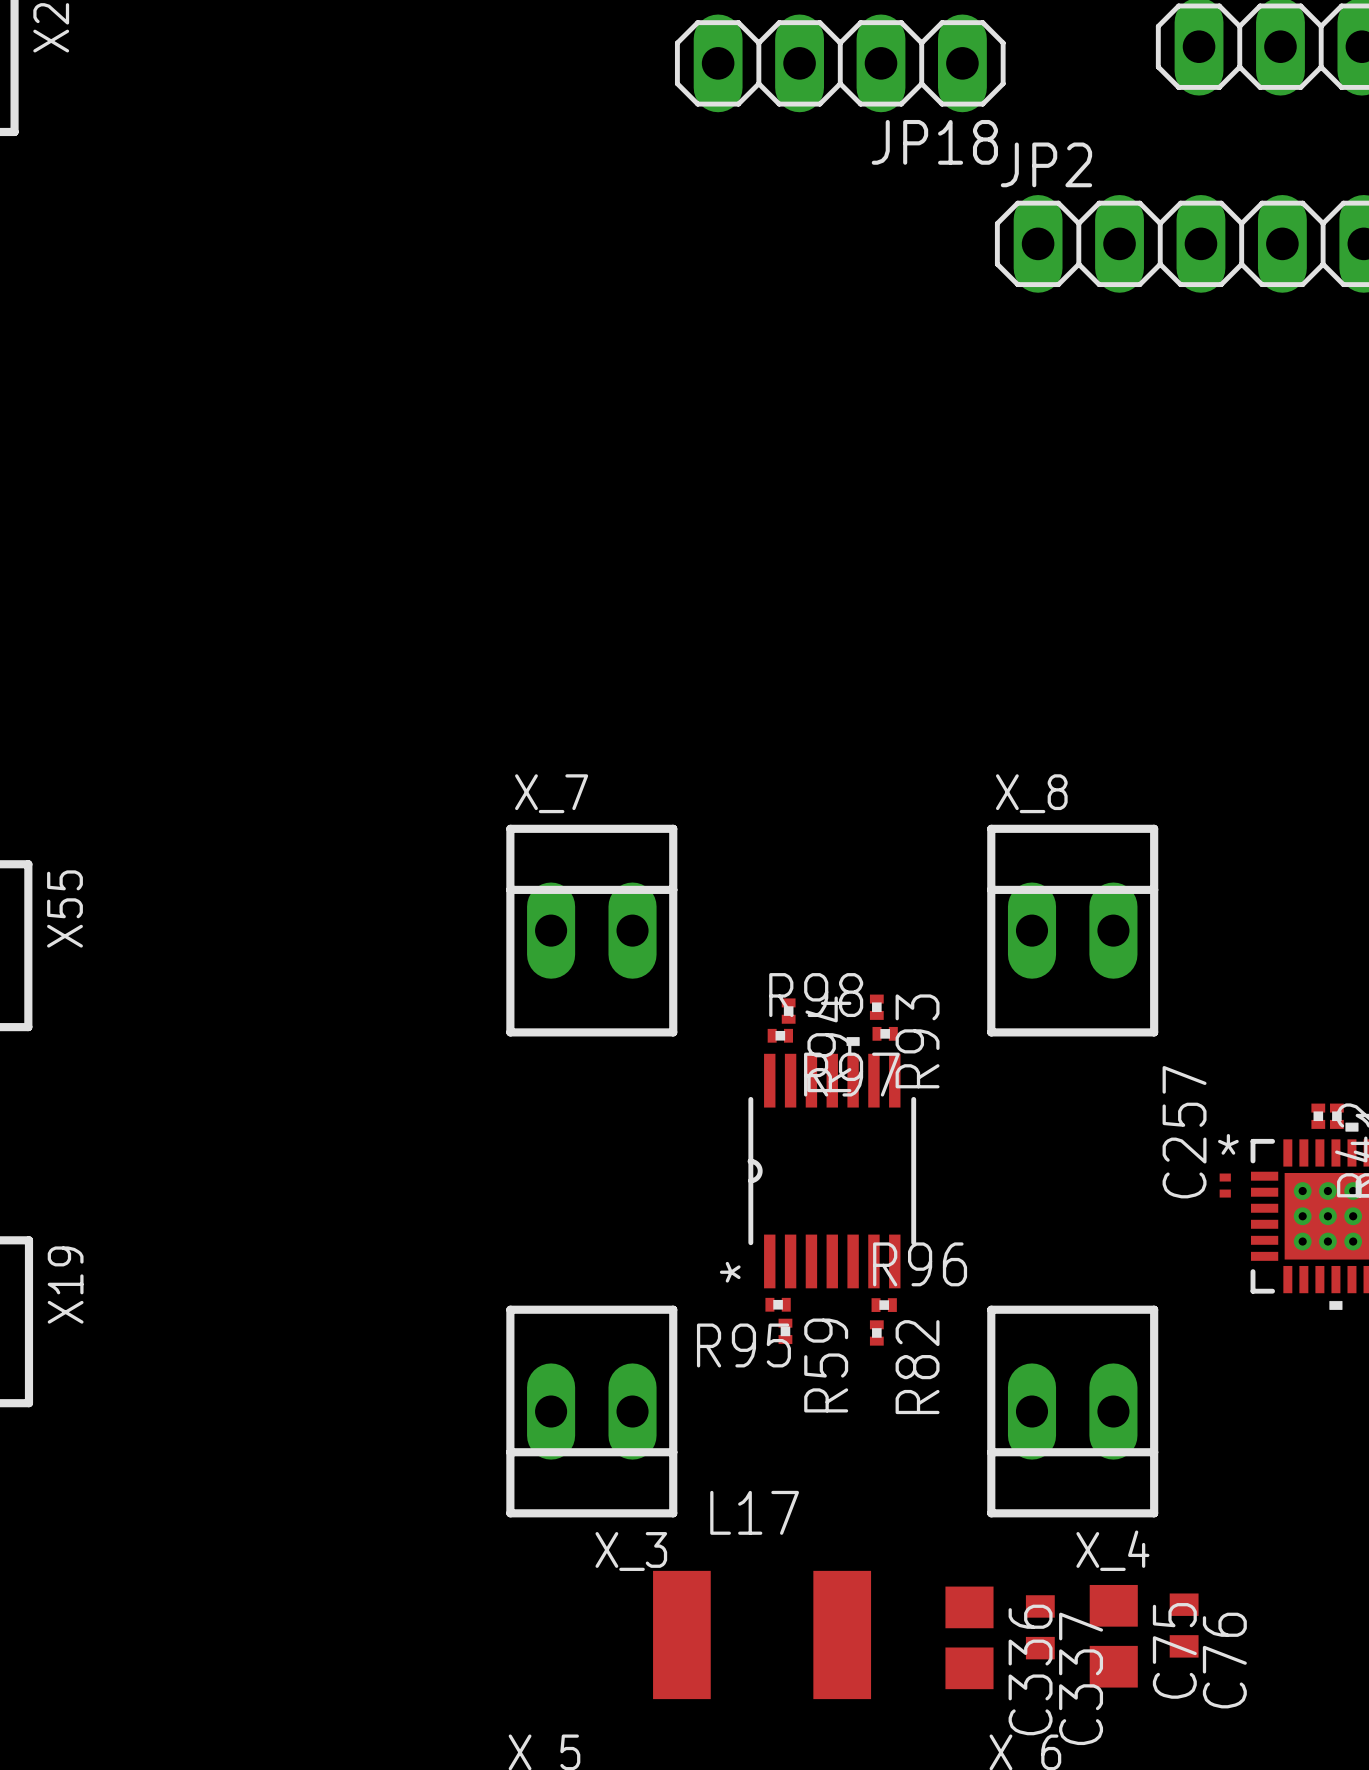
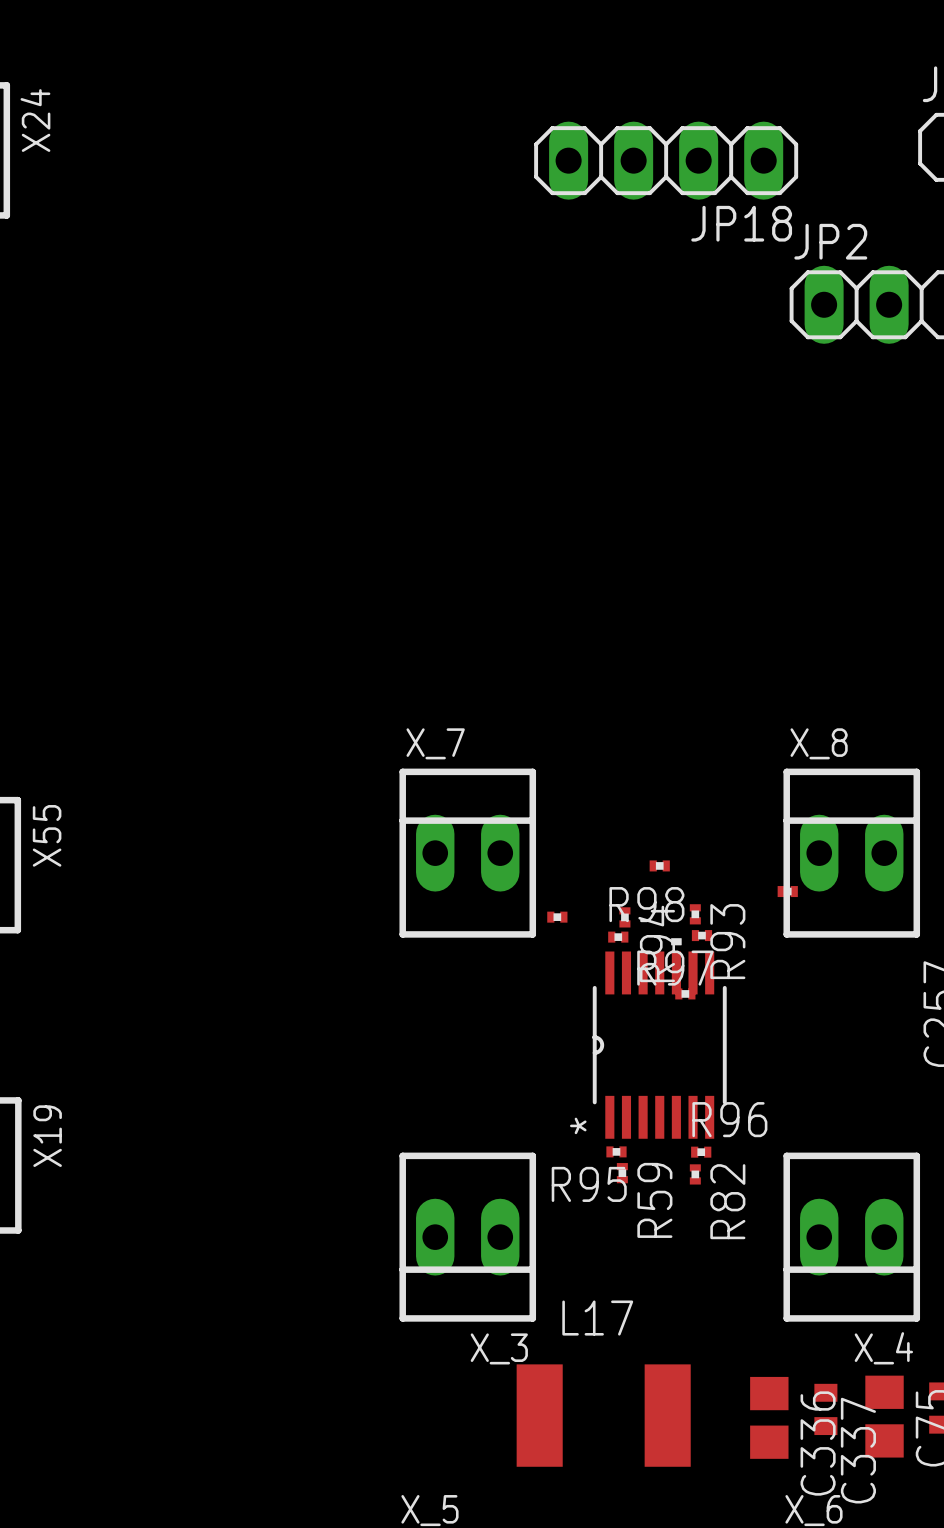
part: none -> (659, 865)
part: none -> (787, 891)
part: none -> (557, 917)
part: none -> (685, 993)

